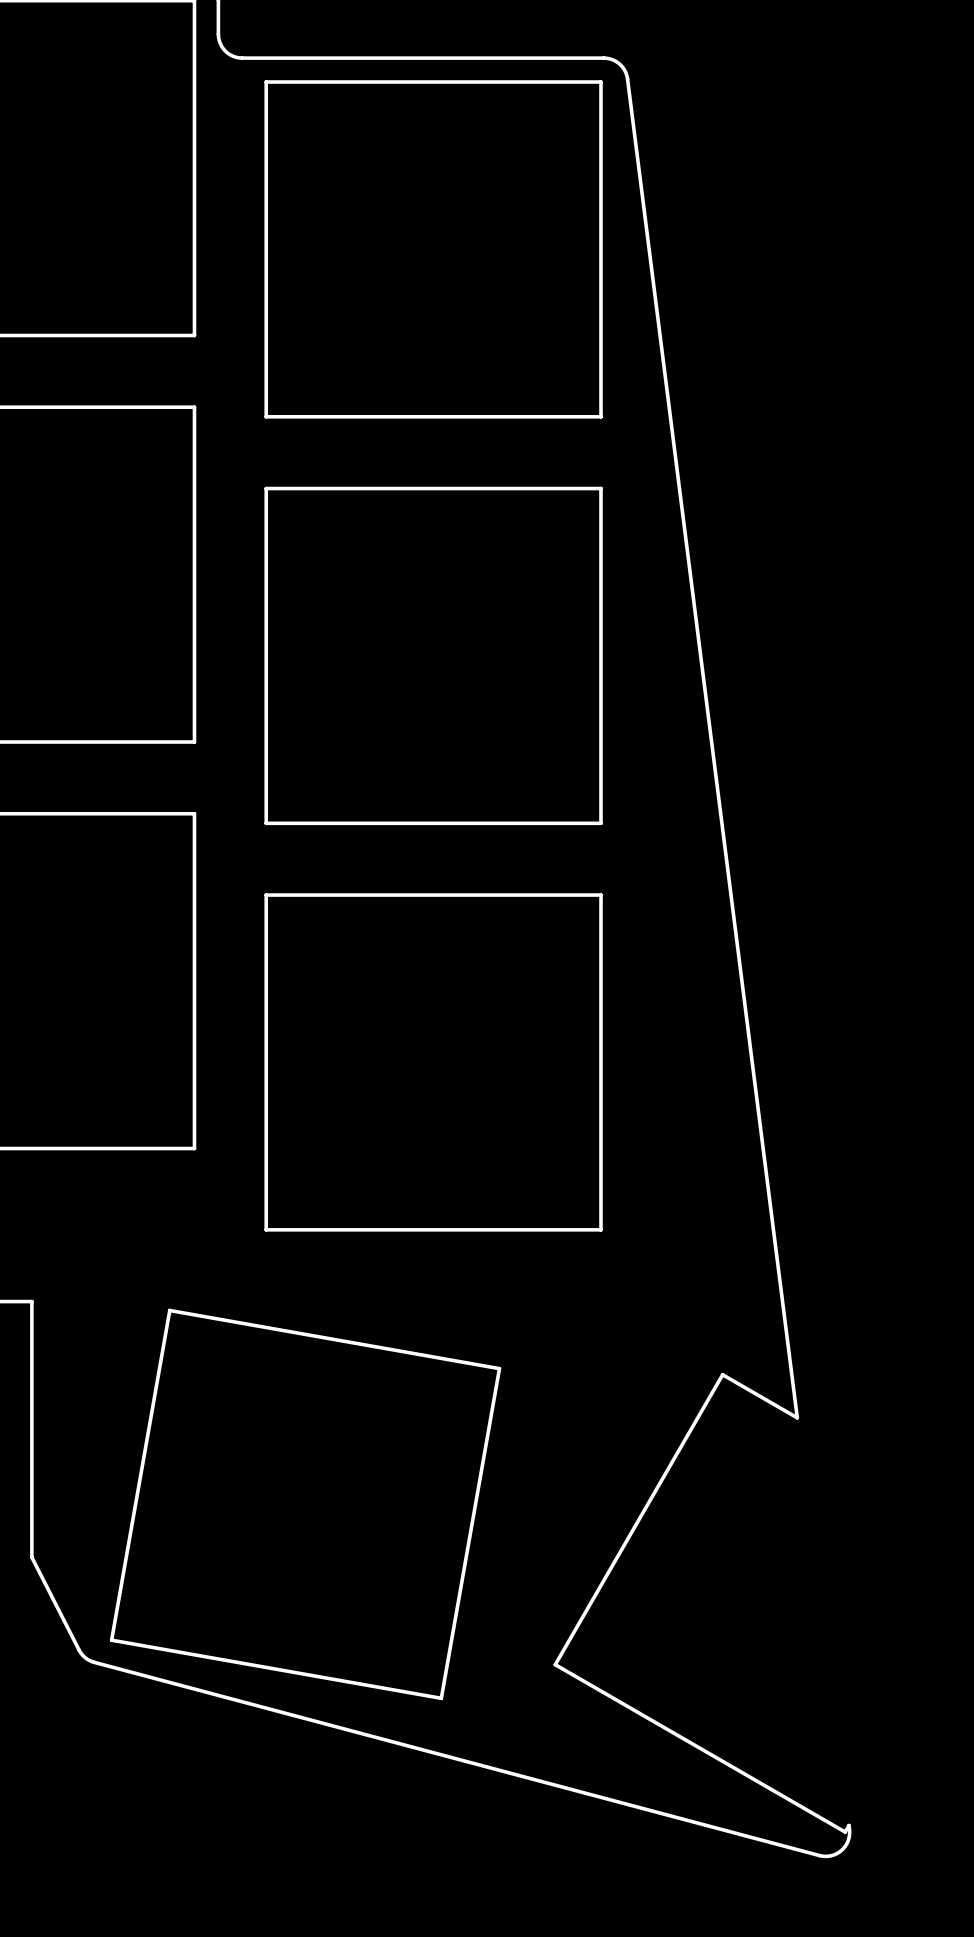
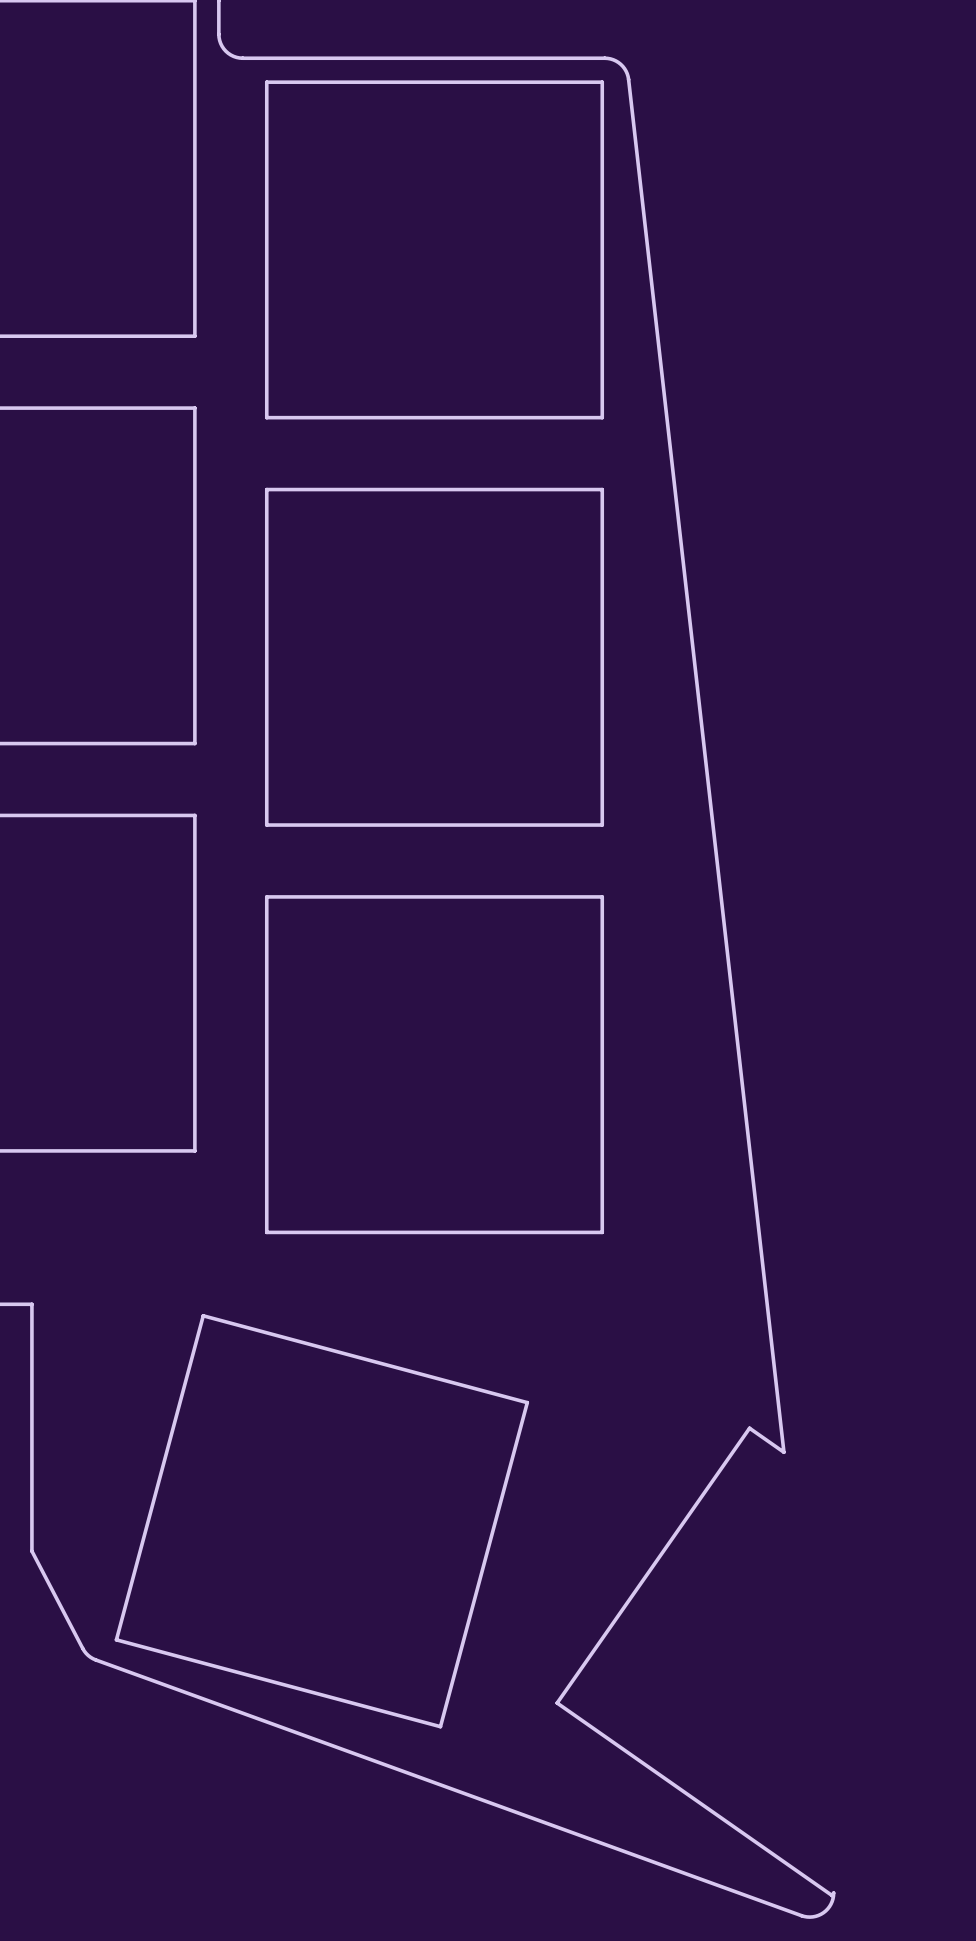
board edge: (603, 58) (612, 59) (619, 64) (624, 70) (627, 79) (797, 1417) (722, 1374) (555, 1664) (845, 1832) (848, 1825) (848, 1840) (843, 1848) (836, 1853) (828, 1856) (819, 1855) (91, 1661) (85, 1657) (79, 1650) (31, 1557) (31, 1547) -> (604, 58) (613, 59) (620, 64) (626, 71) (628, 79) (783, 1452) (749, 1428) (557, 1703) (831, 1895) (833, 1893) (832, 1901) (825, 1910) (818, 1915) (810, 1917) (801, 1915) (93, 1658) (82, 1648) (31, 1551)
board edge: (169, 1310) (499, 1368) (441, 1698) (111, 1640) (169, 1310) -> (203, 1315) (116, 1639) (440, 1726) (527, 1402) (203, 1315)

